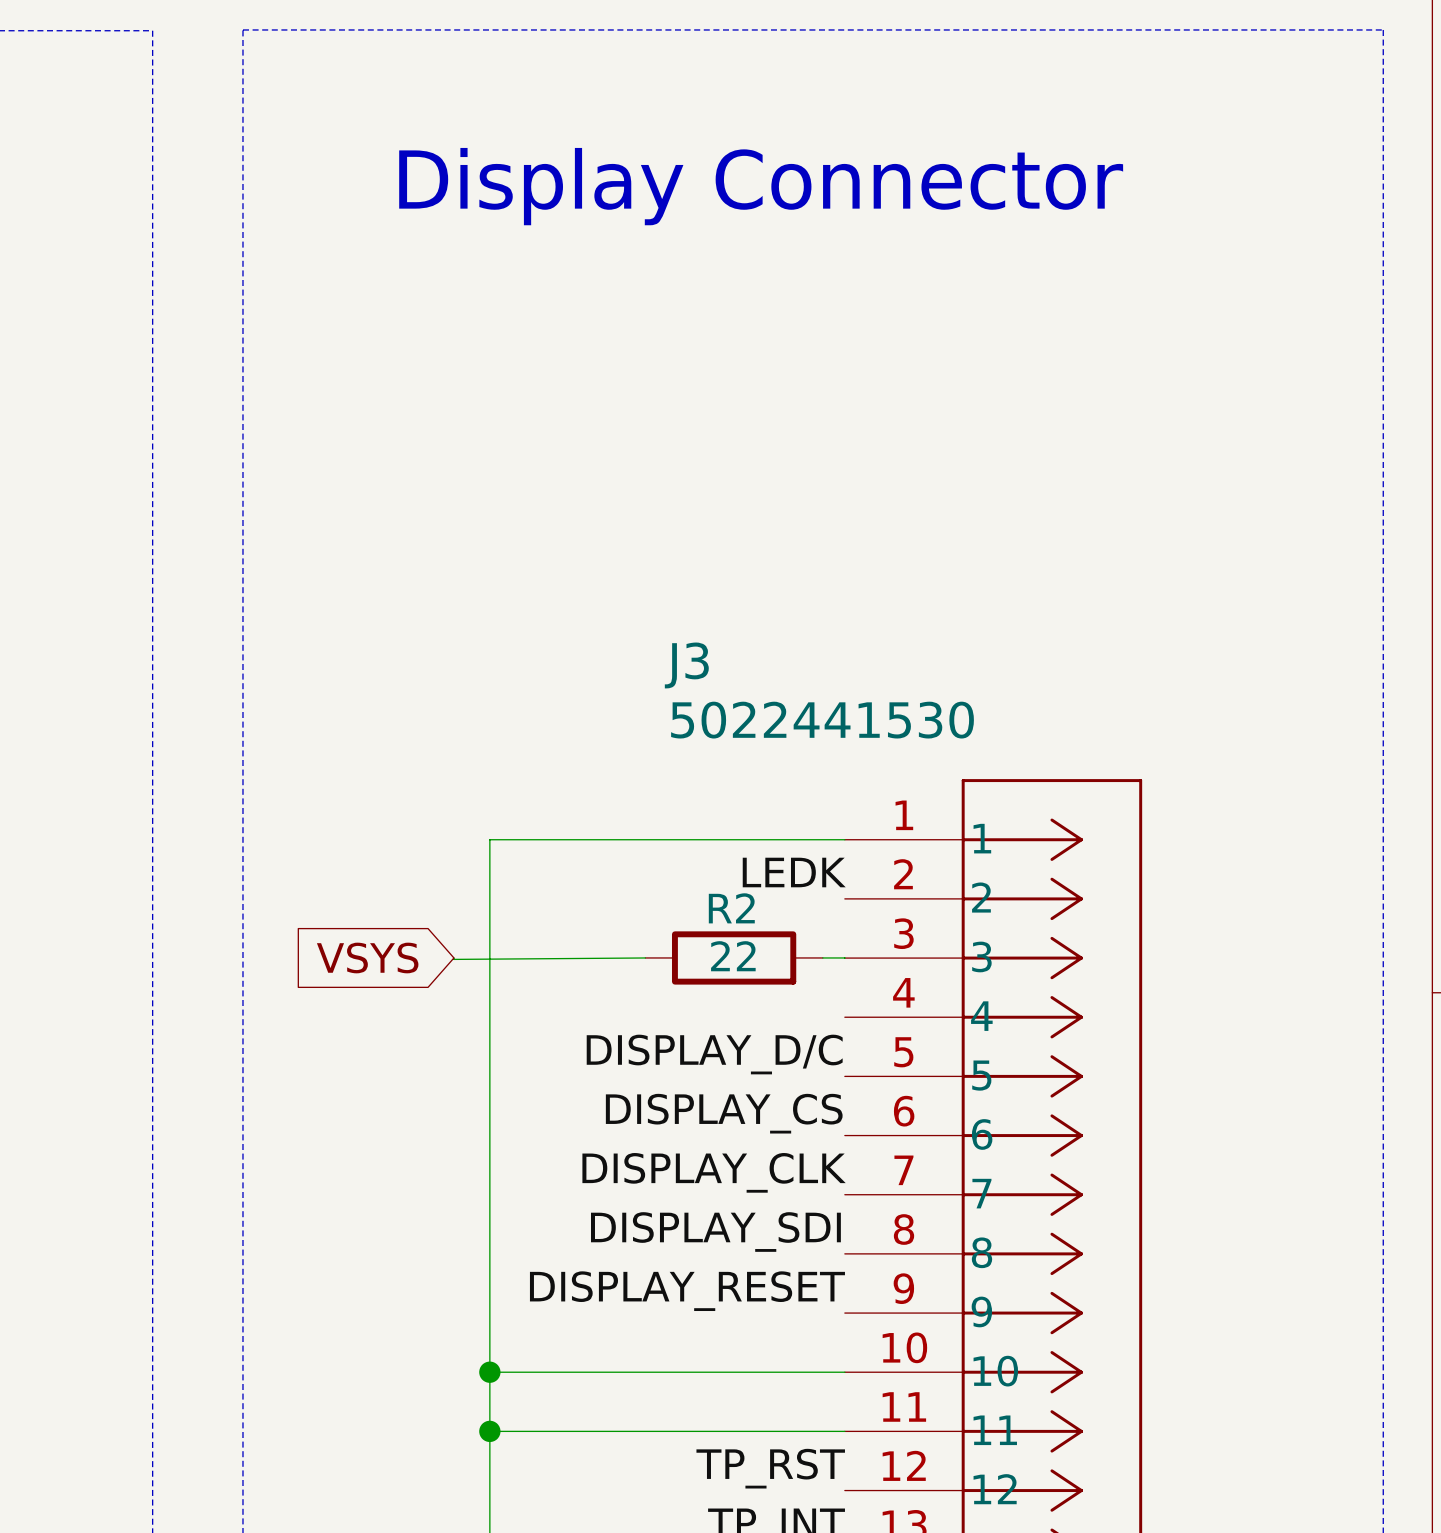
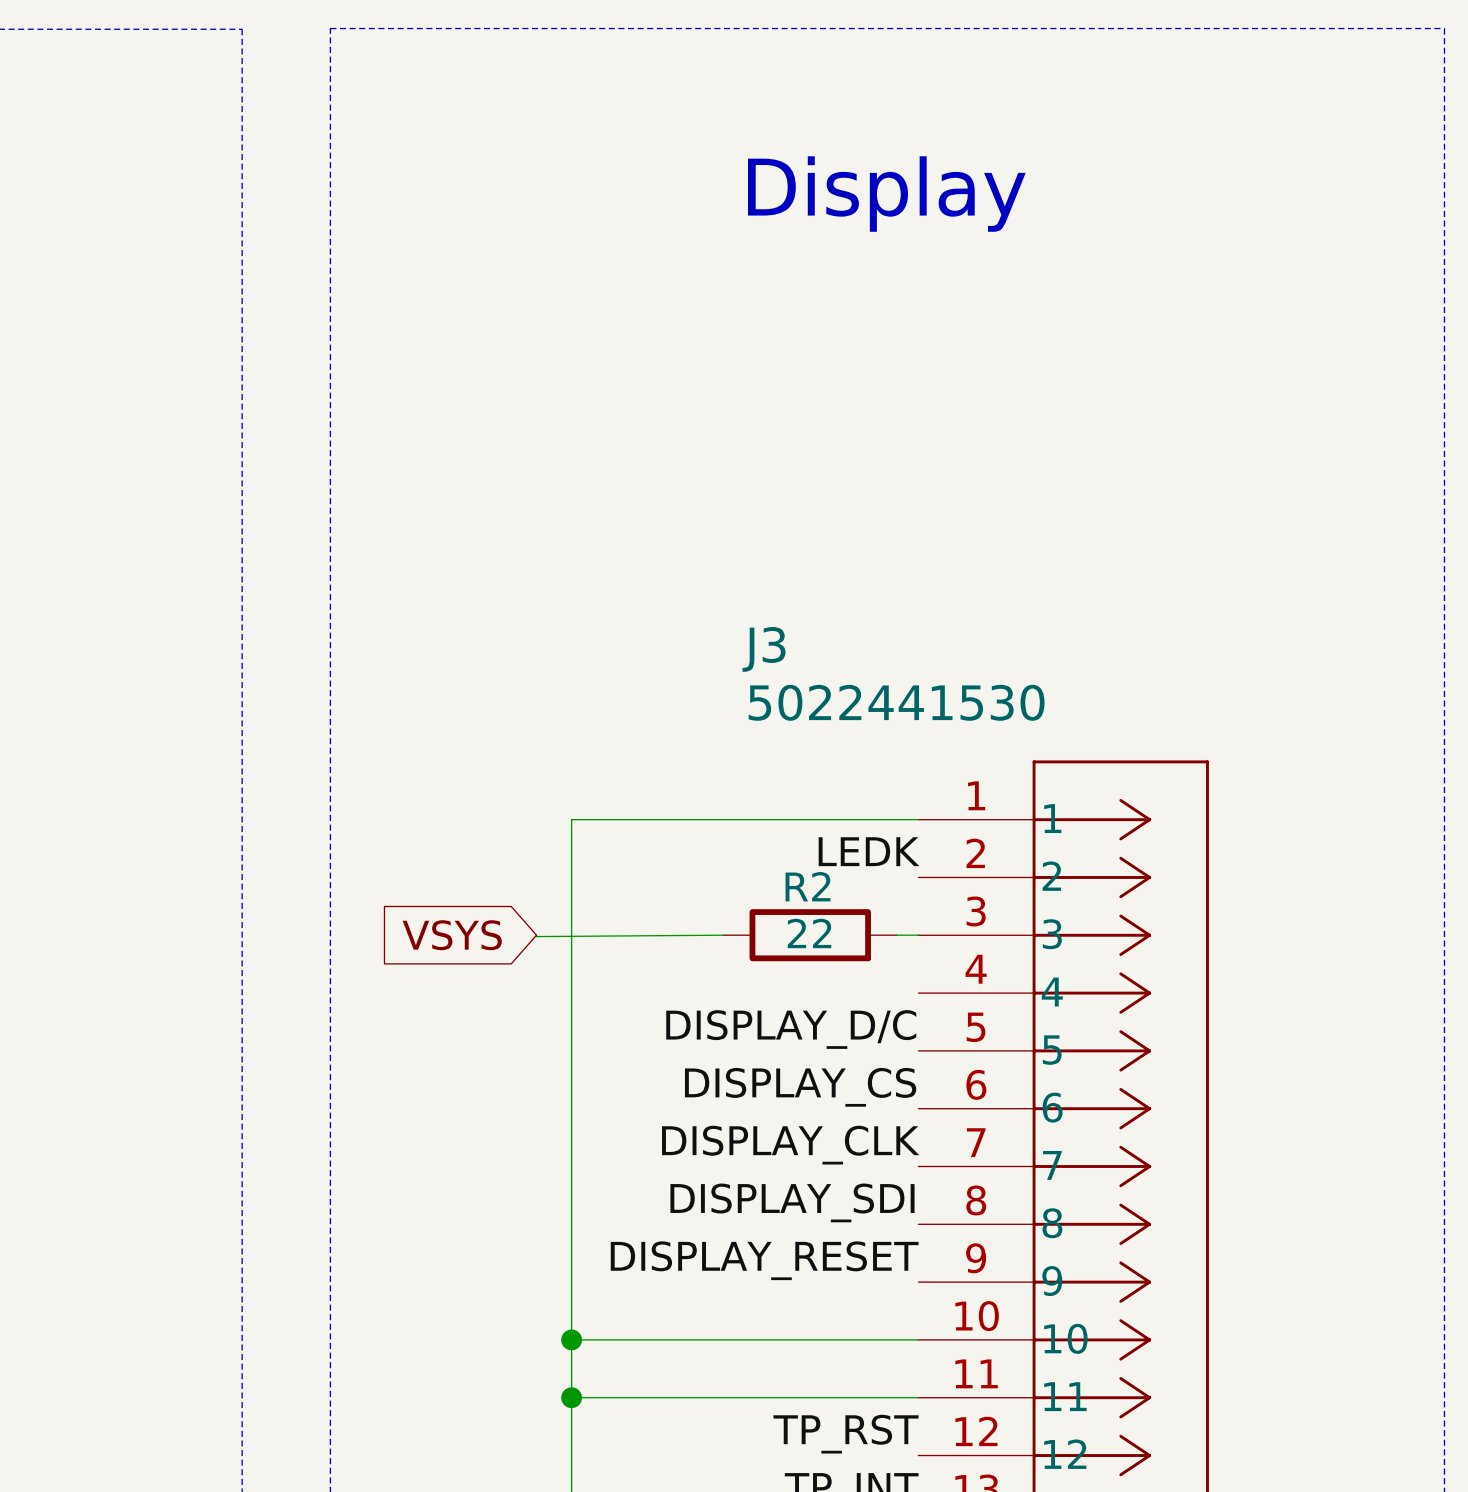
text: Display Connector (761, 186) -> none
text: none -> Display (886, 194)

